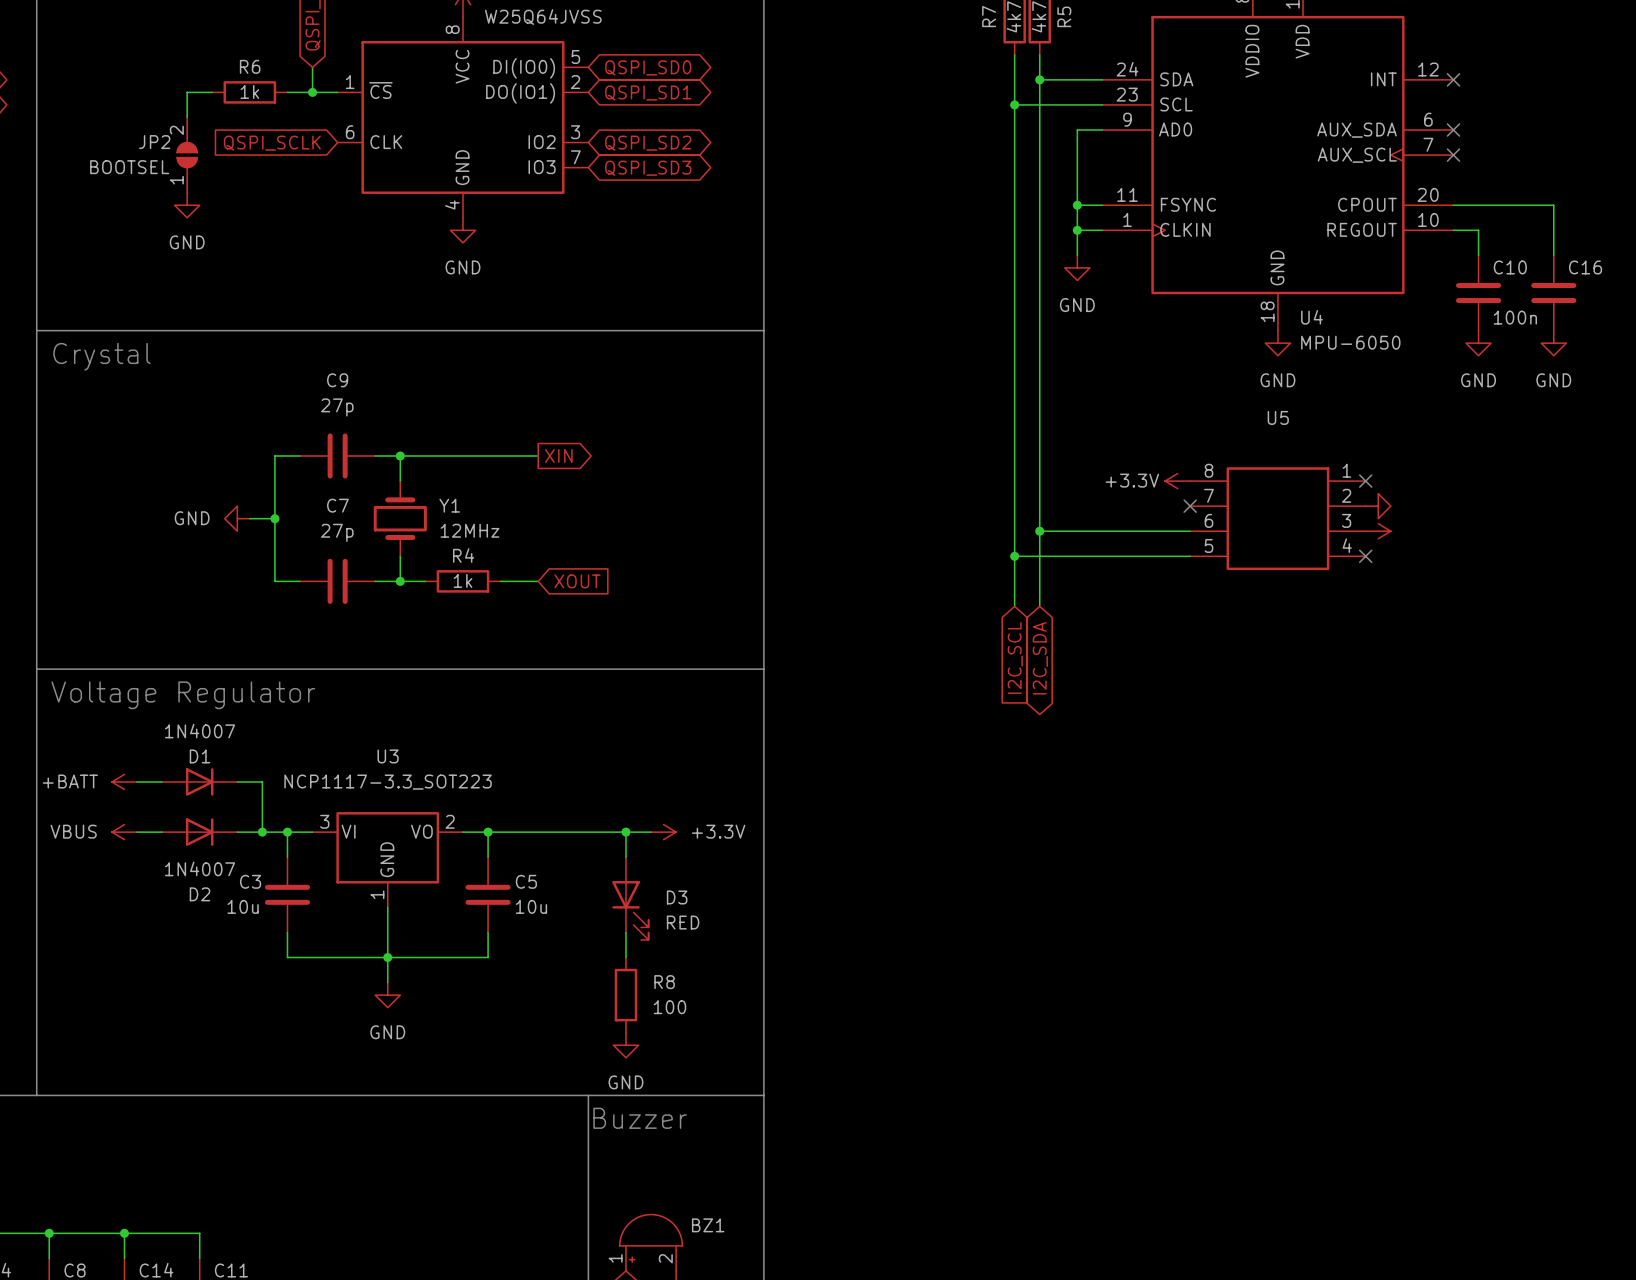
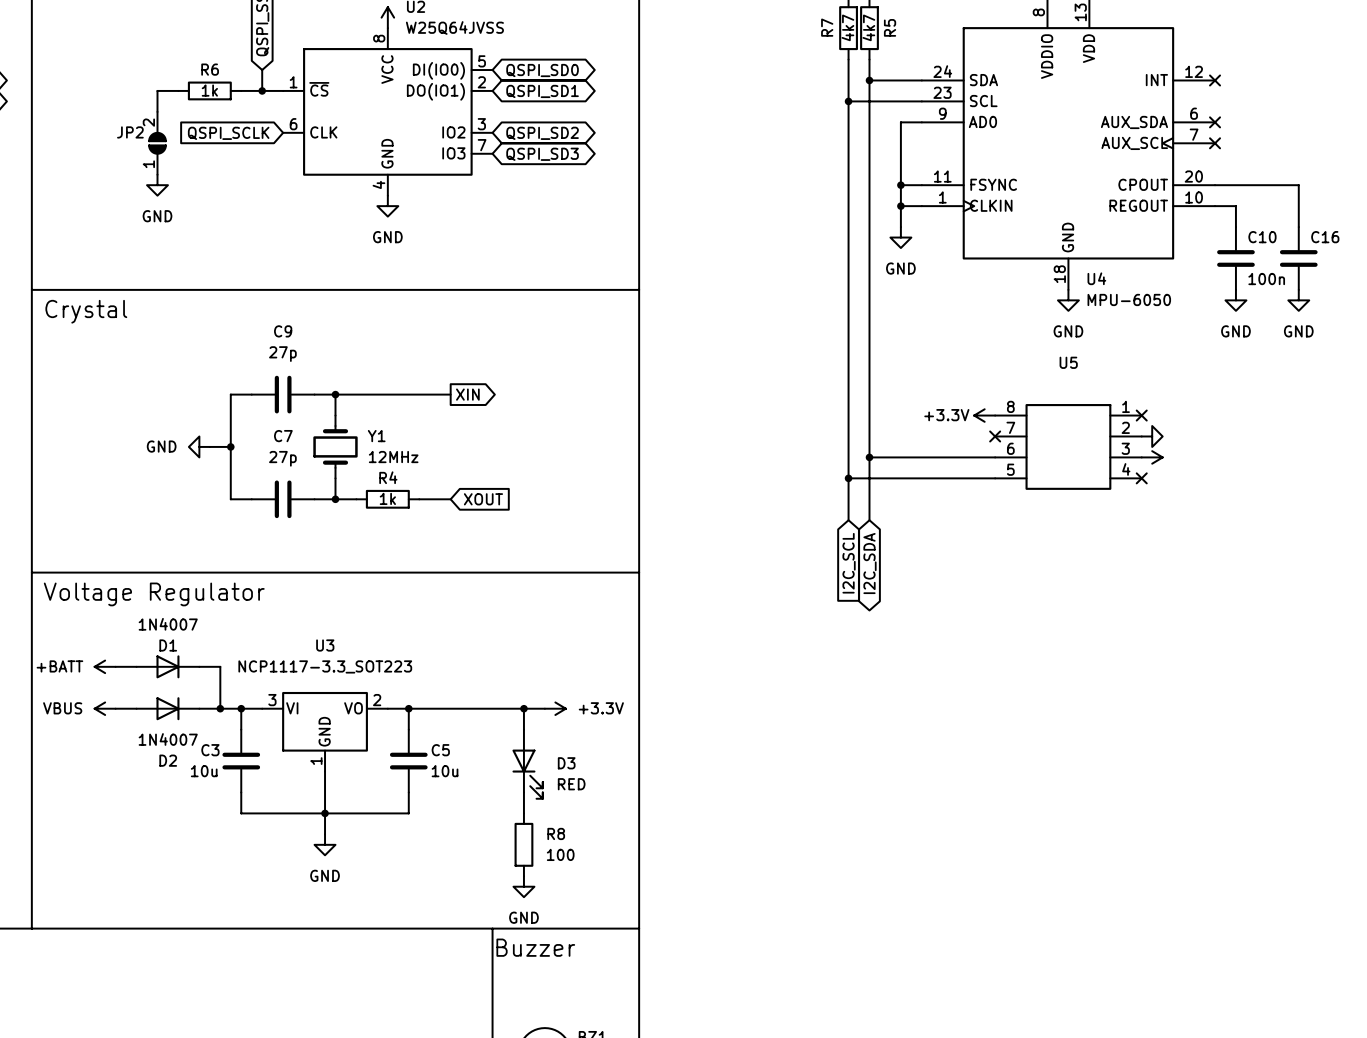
JP2 value: BOOTSEL (129, 167) -> none

